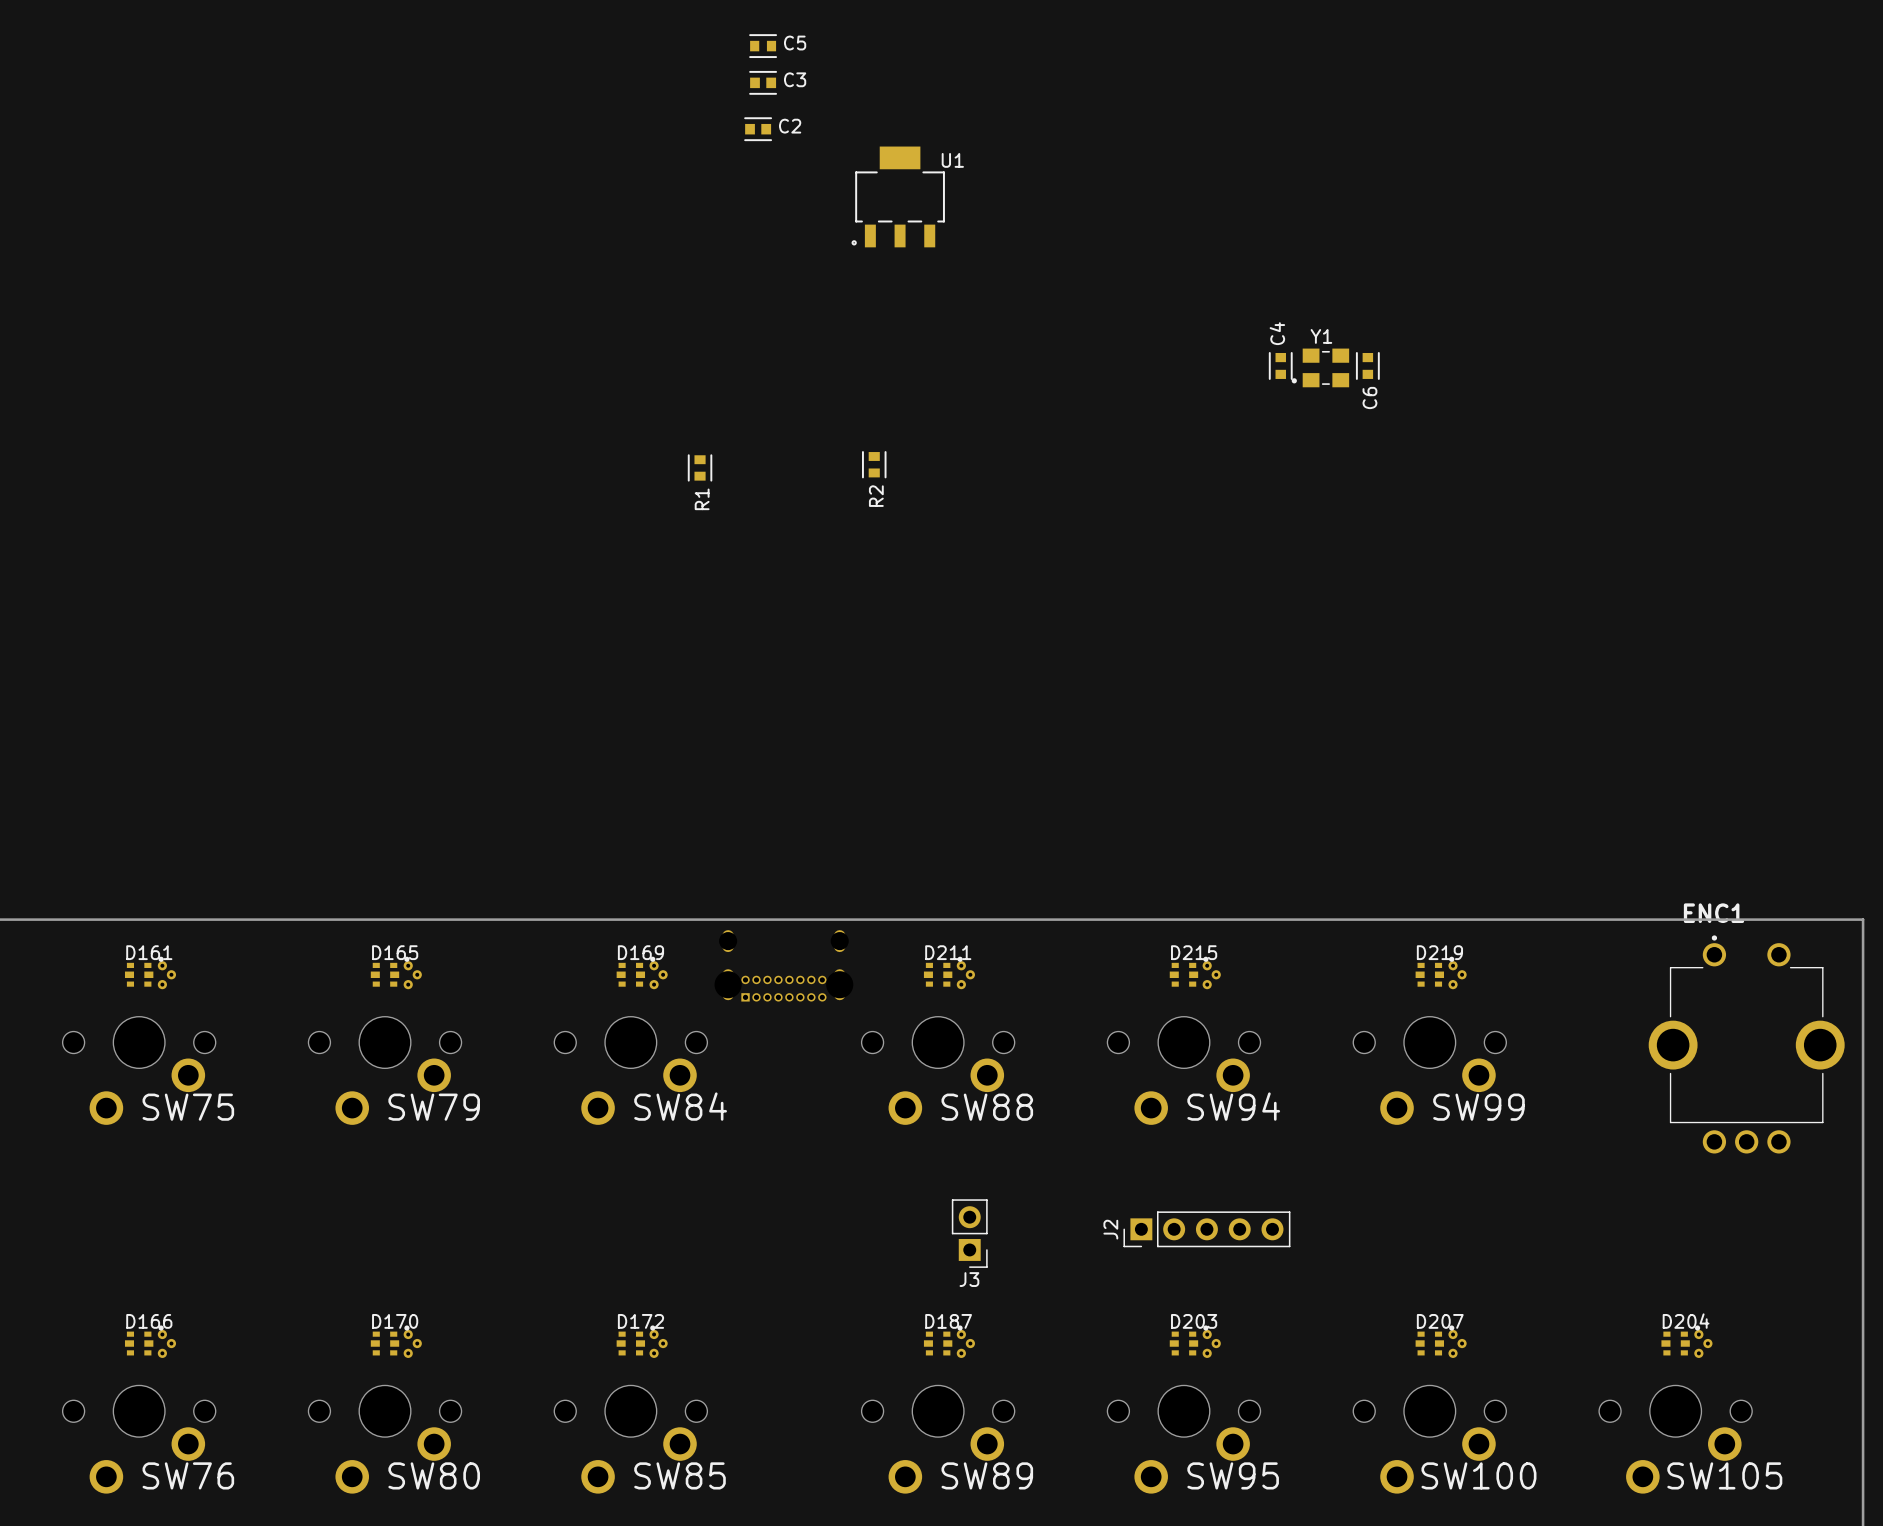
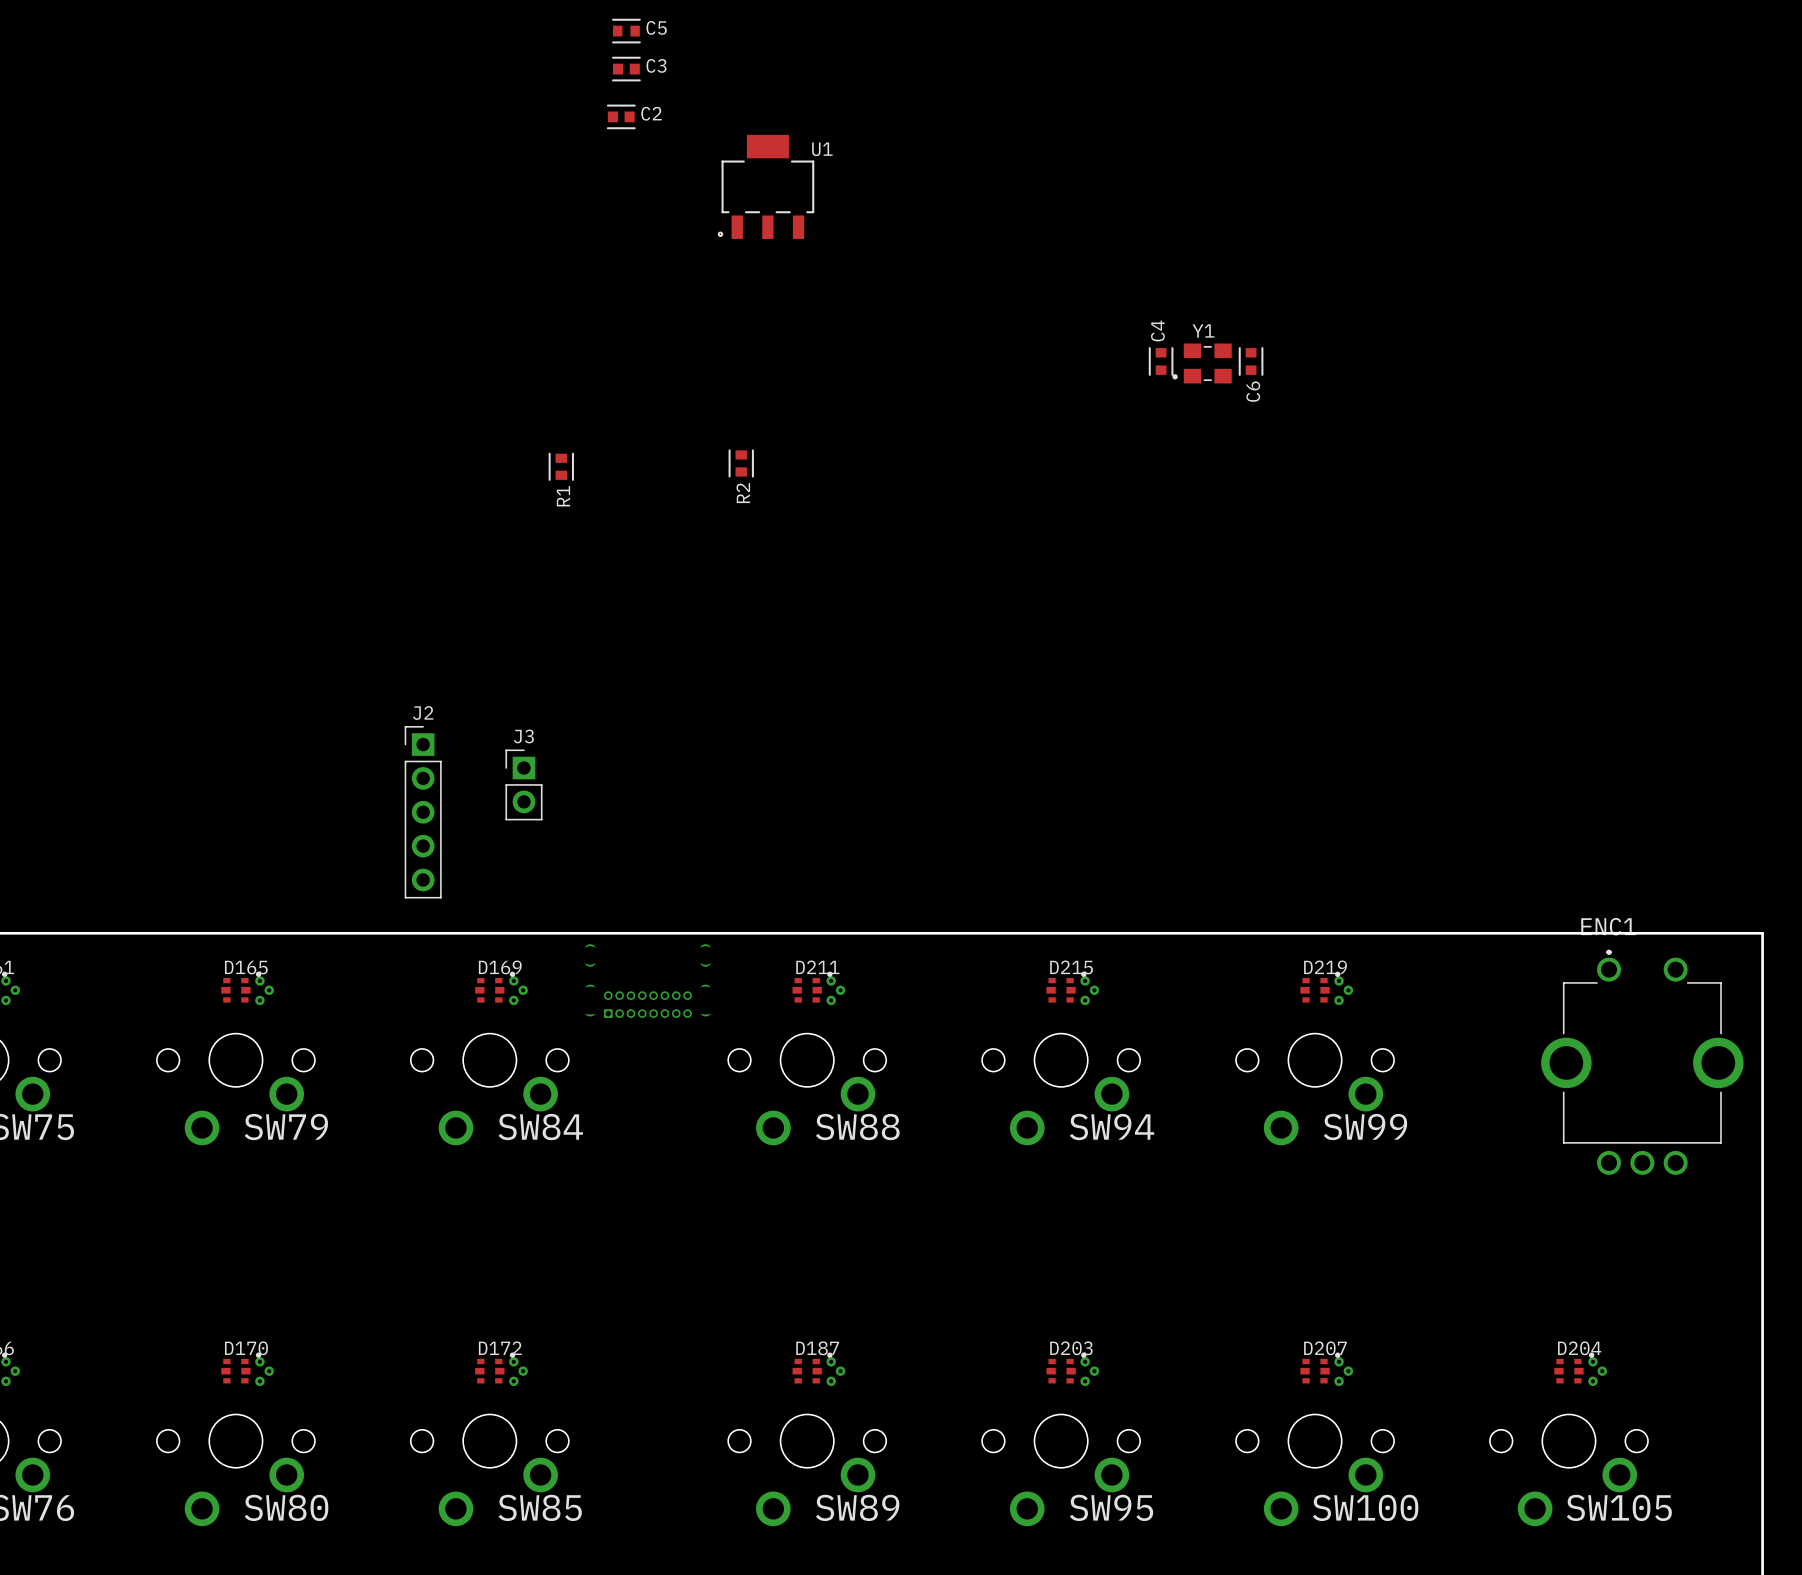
J2 rotation: 0° (1206, 1229) -> 90° clockwise (423, 812)
J2 position: (1206, 1229) -> (423, 812)
J3 rotation: 0° (969, 1233) -> 180° (523, 784)
J3 position: (969, 1233) -> (523, 784)

